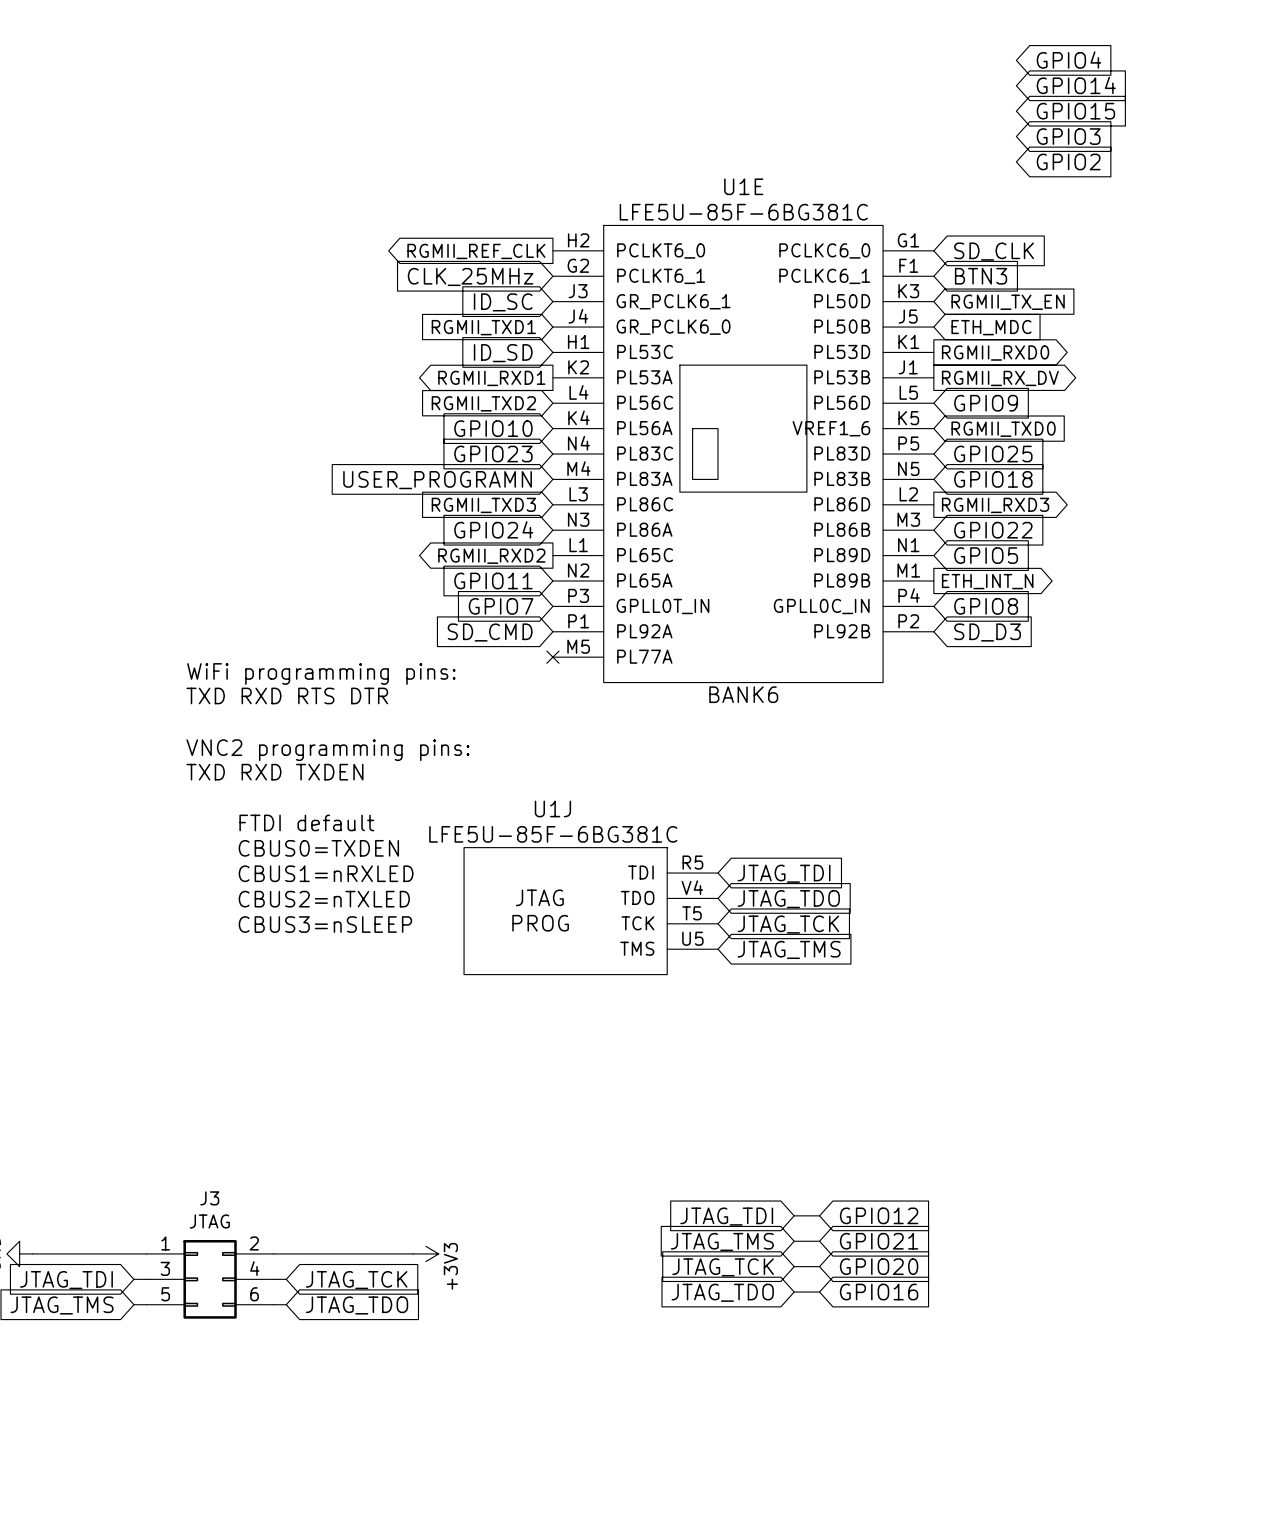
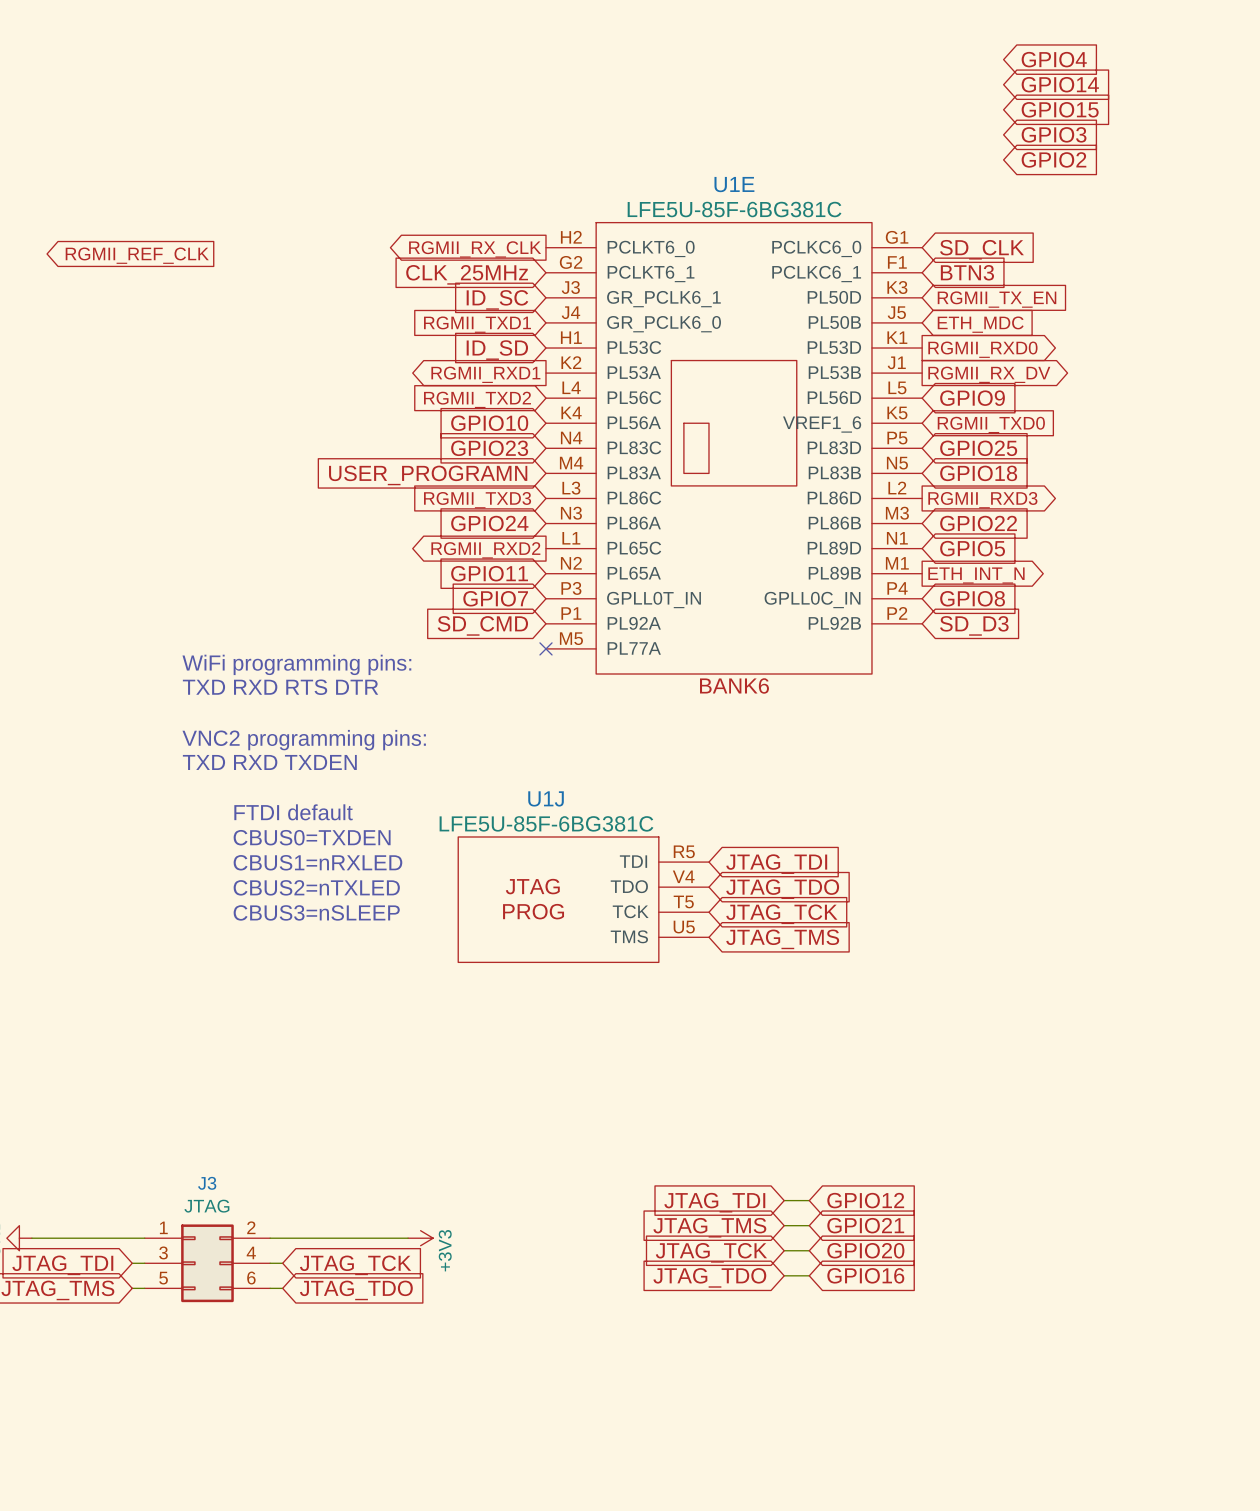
global label: RGMII_REF_CLK (476, 251) -> RGMII_RX_CLK (475, 249)
global label: none -> RGMII_REF_CLK (137, 255)

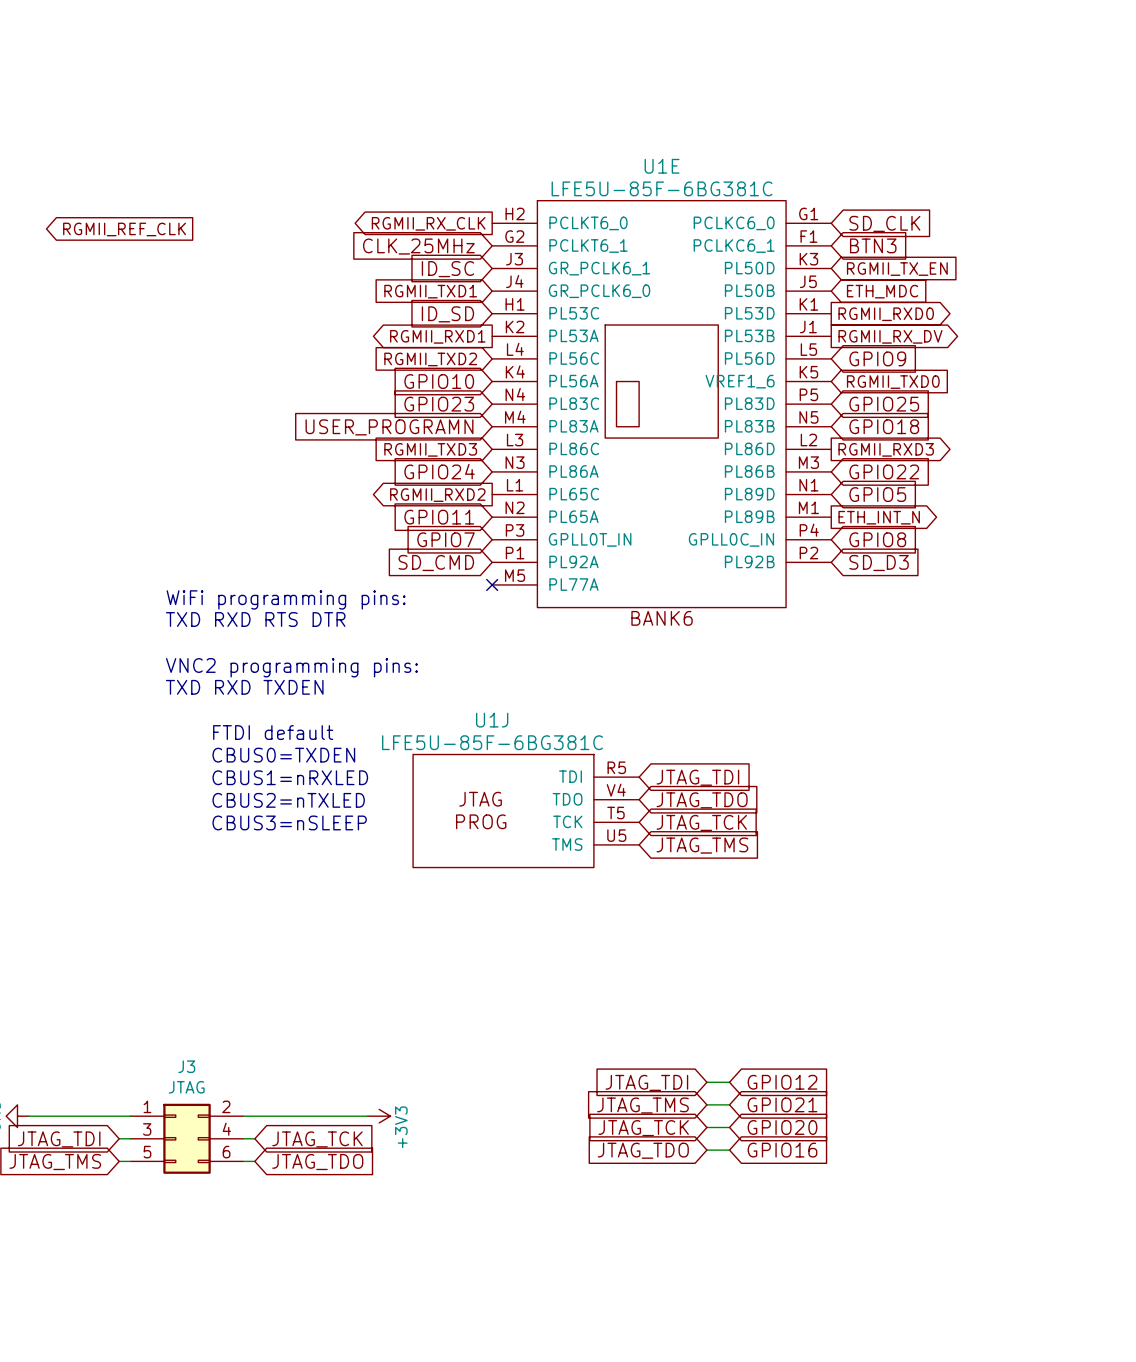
global label: GPIO4 (1054, 59) -> none
global label: GPIO14 (1060, 84) -> none
global label: GPIO15 (1060, 109) -> none
global label: GPIO3 (1054, 134) -> none
global label: GPIO2 (1053, 159) -> none

